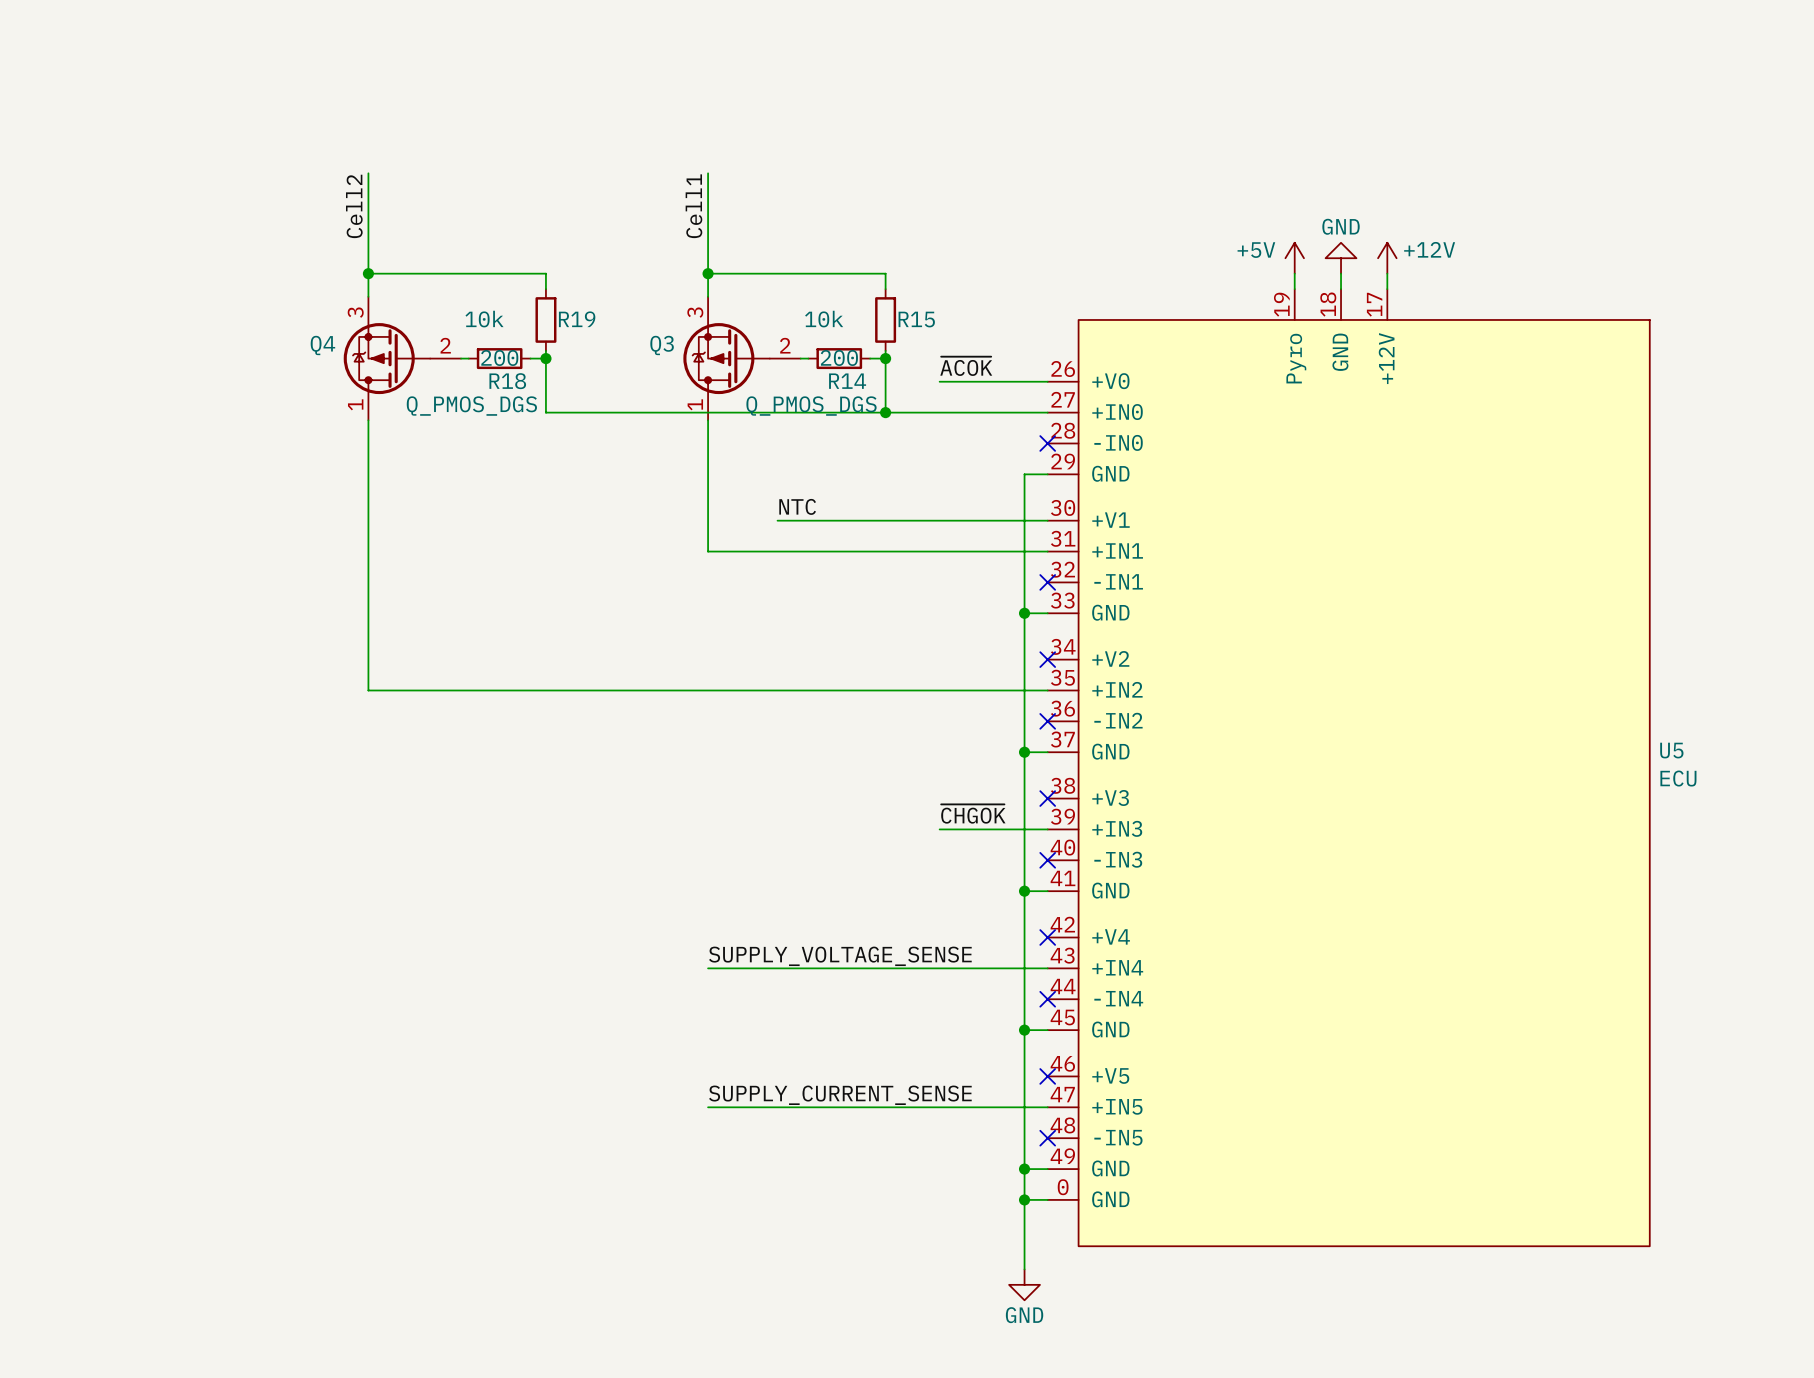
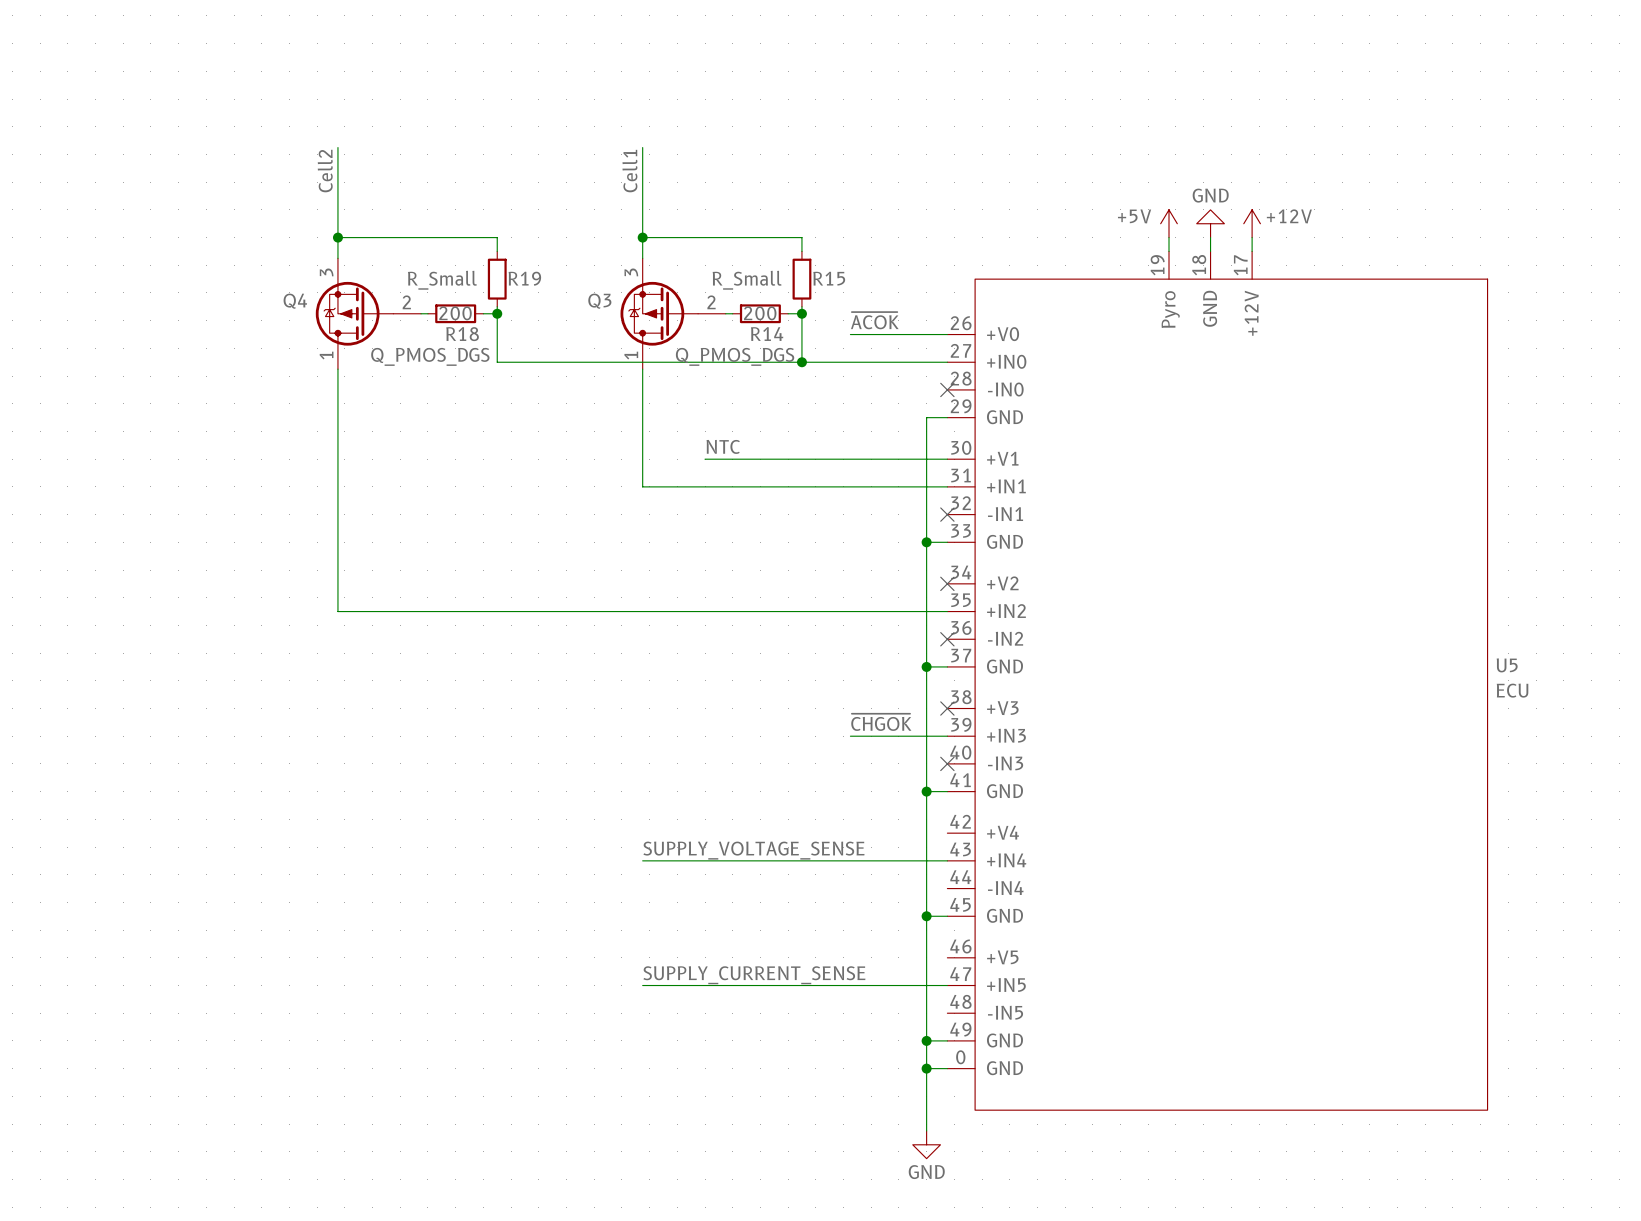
R19 value: 10k (484, 319) -> R_Small (442, 280)
R15 value: 10k (824, 319) -> R_Small (747, 280)
no-connect mark: (1047, 937) -> none
no-connect mark: (1047, 999) -> none
no-connect mark: (1047, 1076) -> none
no-connect mark: (1047, 1138) -> none

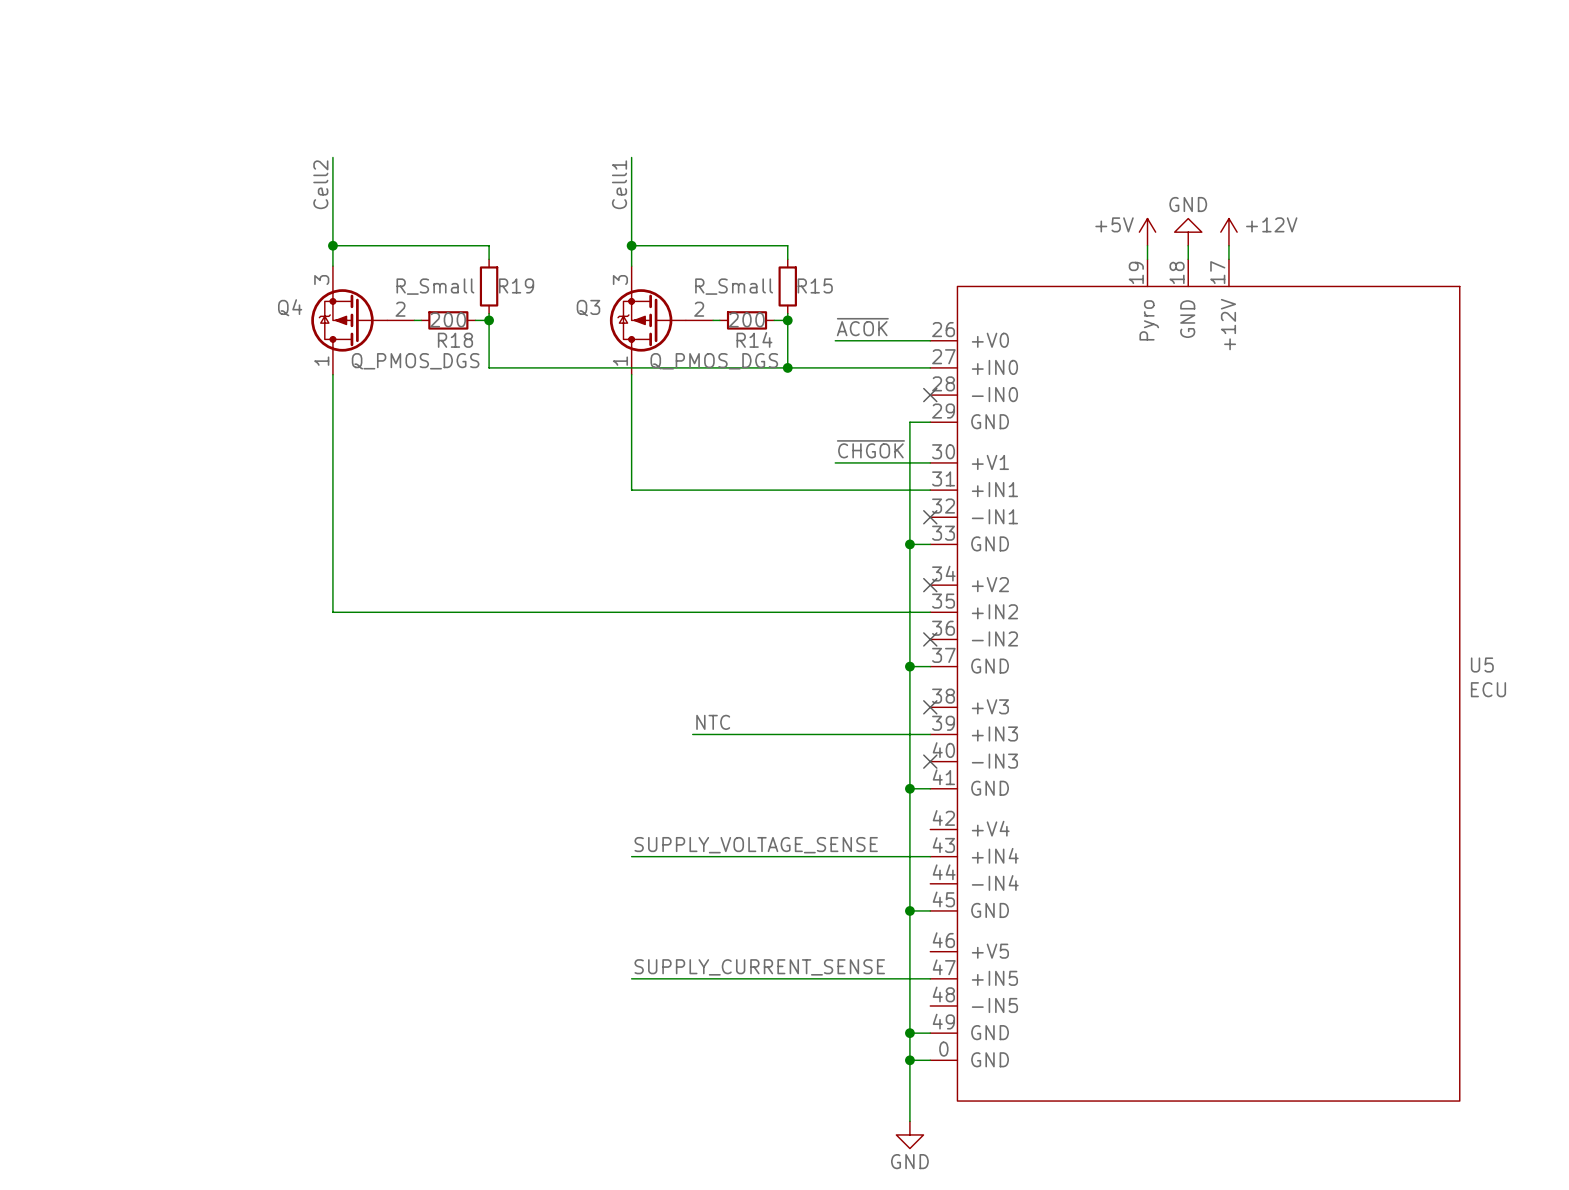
label: none -> ~{CHGOK} (870, 449)
label: NTC (723, 446) -> none
wire: (705, 459) (850, 459) -> none
label: ~{CHGOK} (881, 722) -> none
label: none -> NTC (713, 722)
wire: none -> (692, 734) (835, 734)

